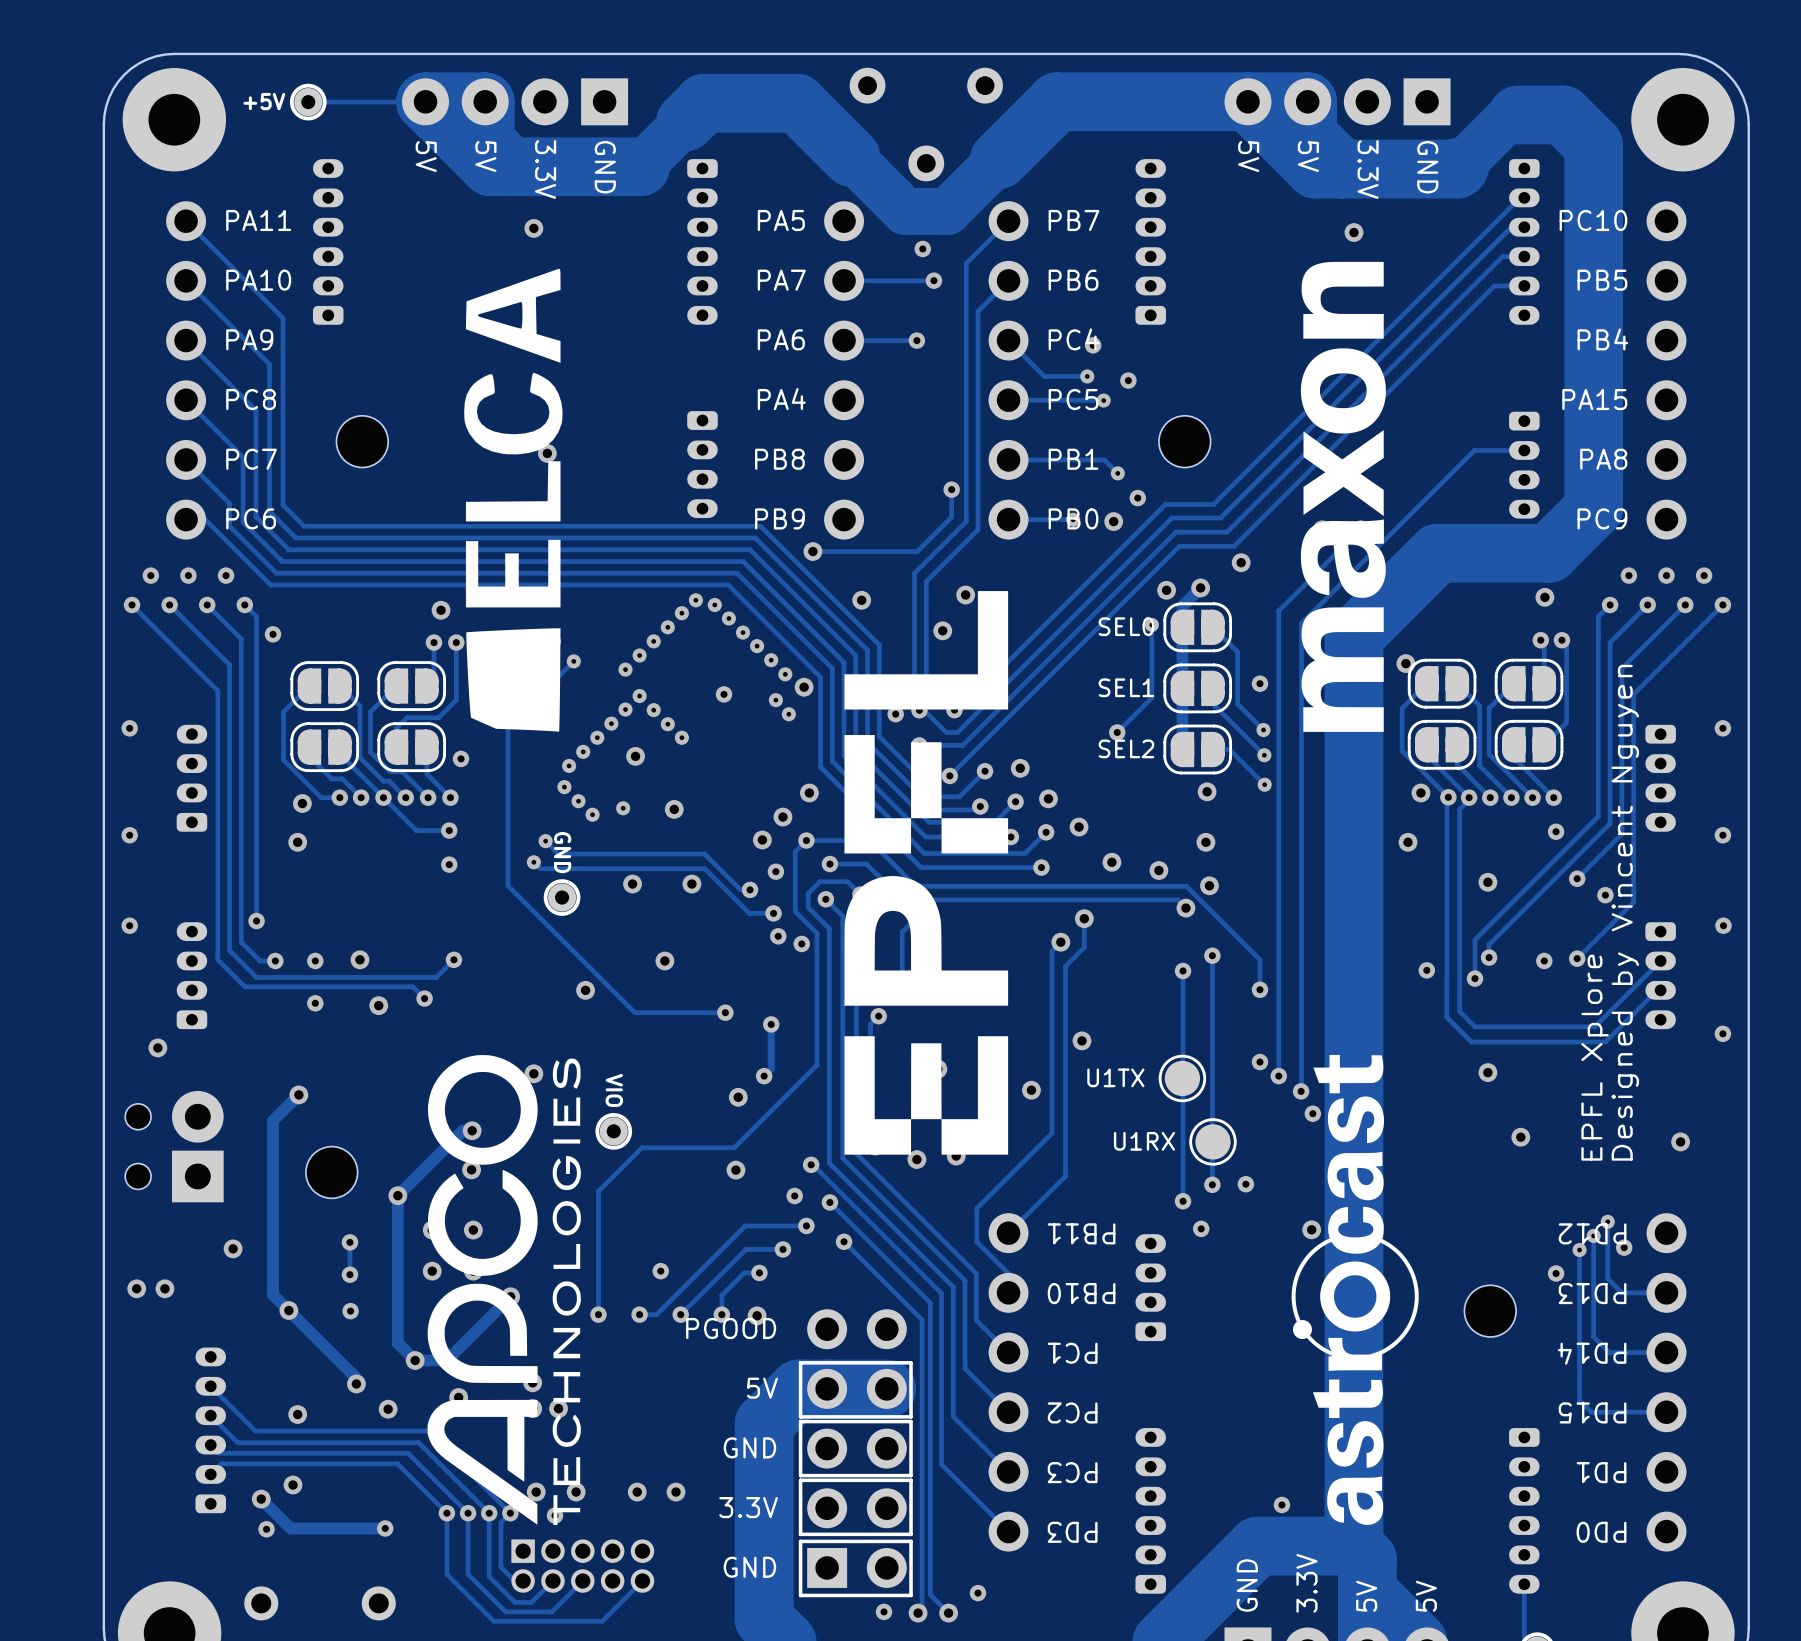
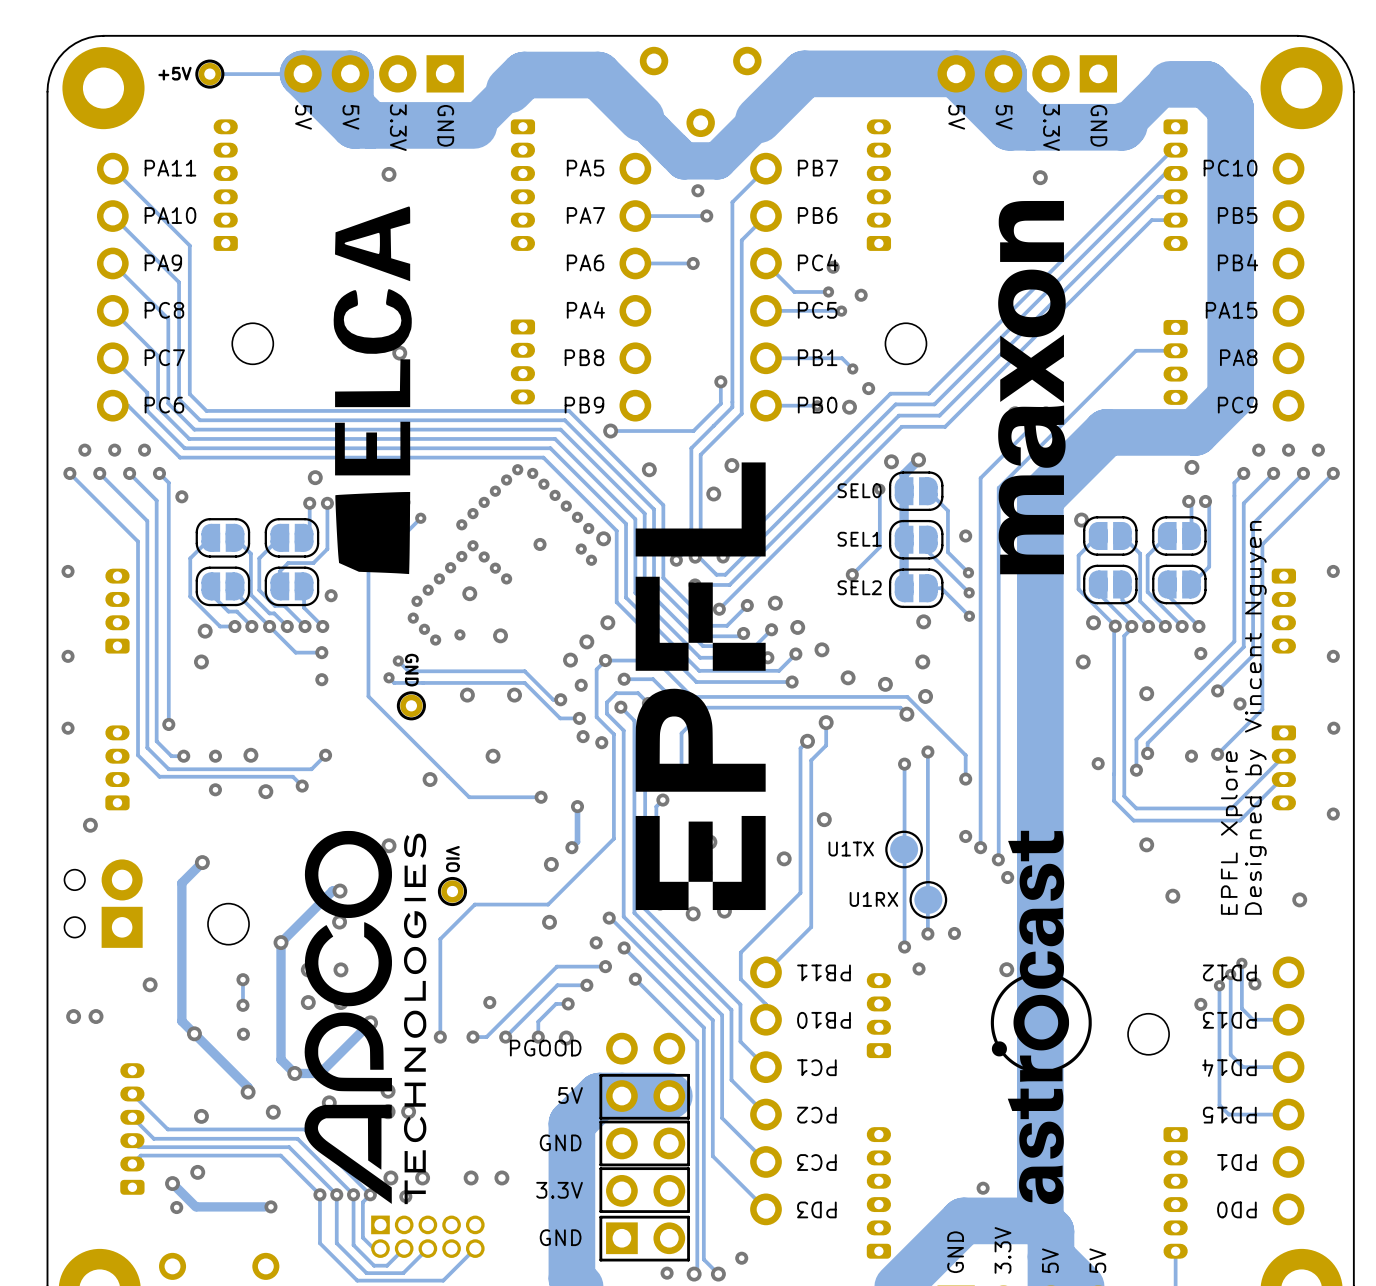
via: (1241, 562) -> none

